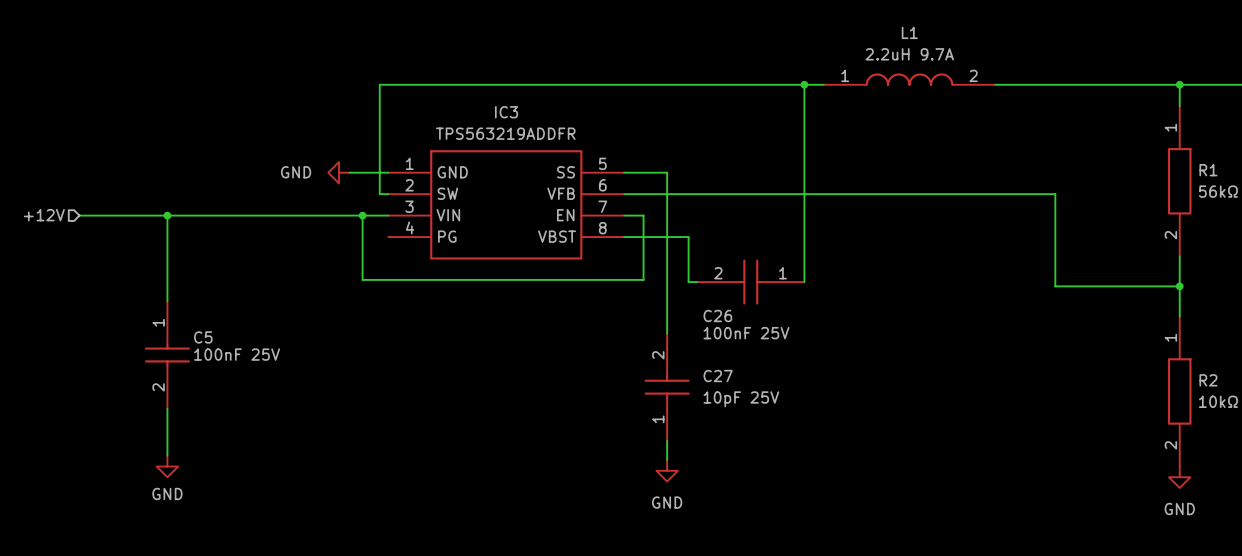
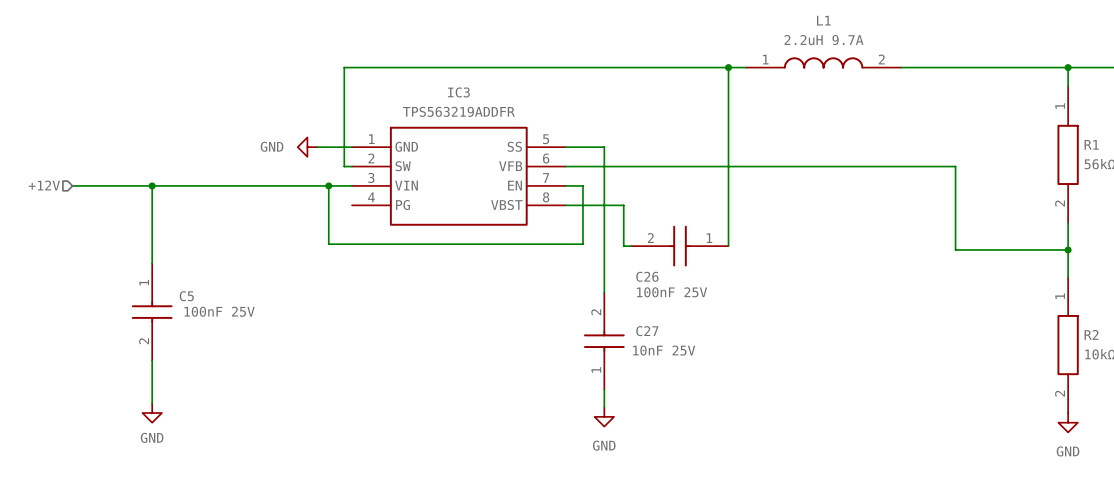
C27 value: 10pF 25V (741, 399) -> 10nF 25V (664, 350)

